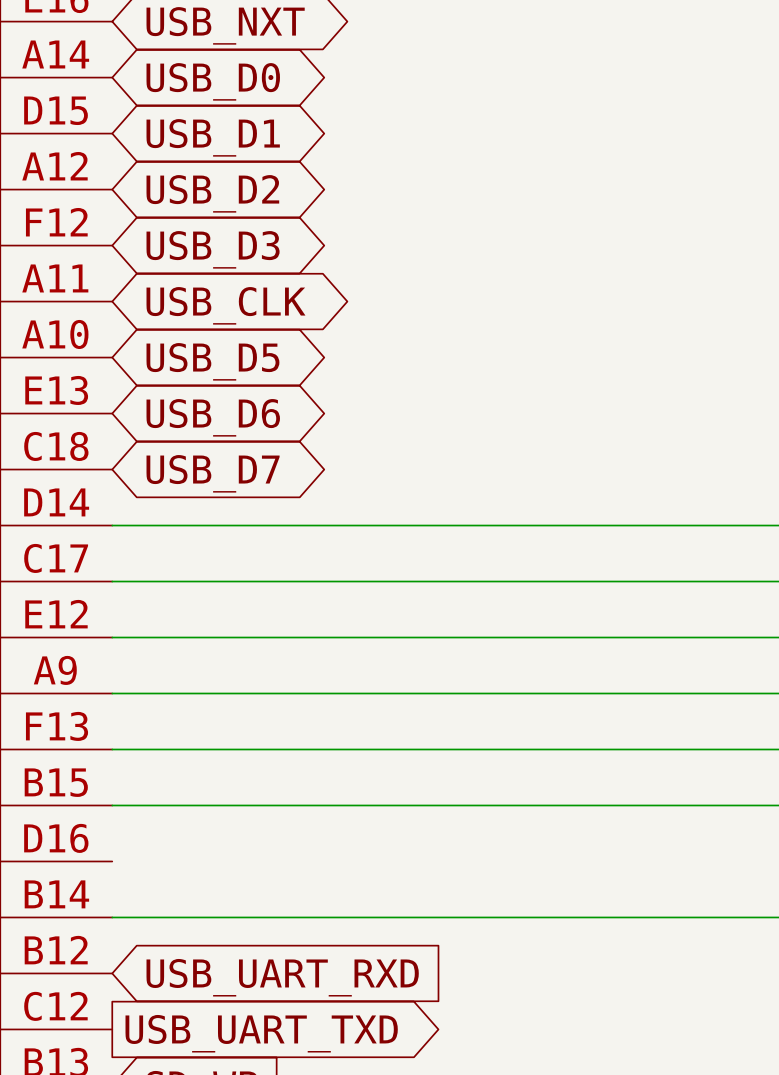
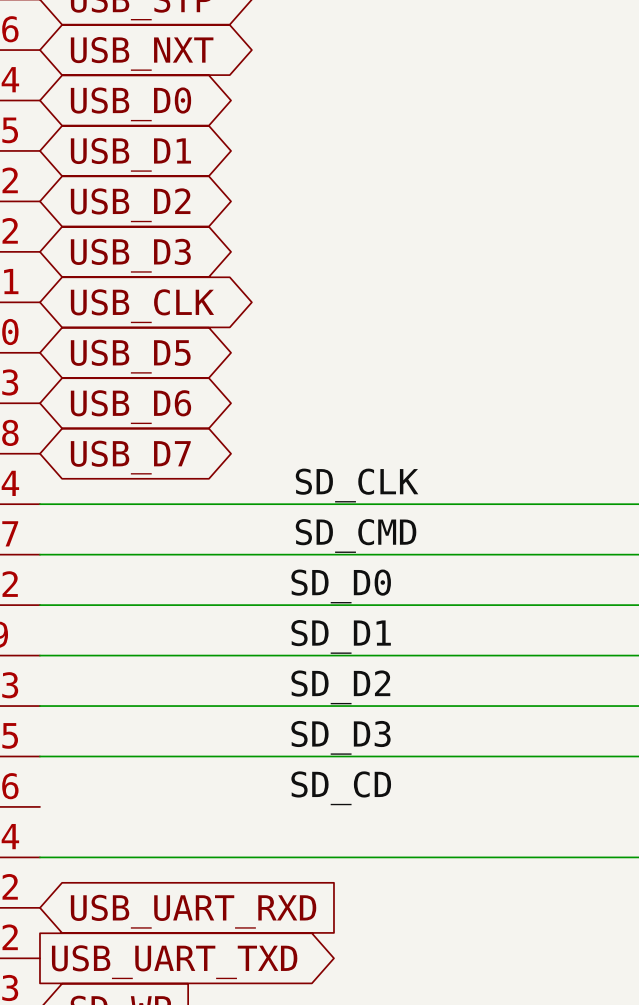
label: none -> SD_CLK (357, 485)
label: none -> SD_CMD (356, 535)
label: none -> SD_D0 (341, 586)
label: none -> SD_D1 (341, 636)
label: none -> SD_D2 (340, 687)
label: none -> SD_D3 (340, 737)
label: none -> SD_CD (341, 788)

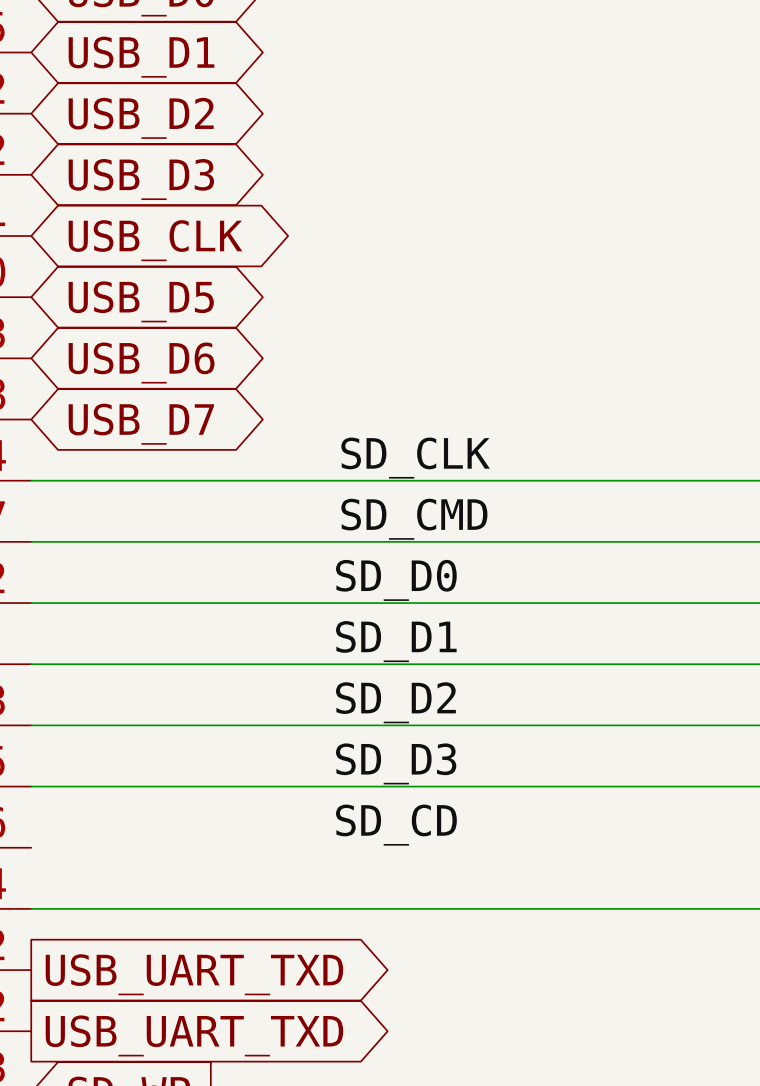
global label shape: input (193, 911) -> output (194, 974)
global label: USB_UART_RXD (193, 911) -> USB_UART_TXD (194, 974)

